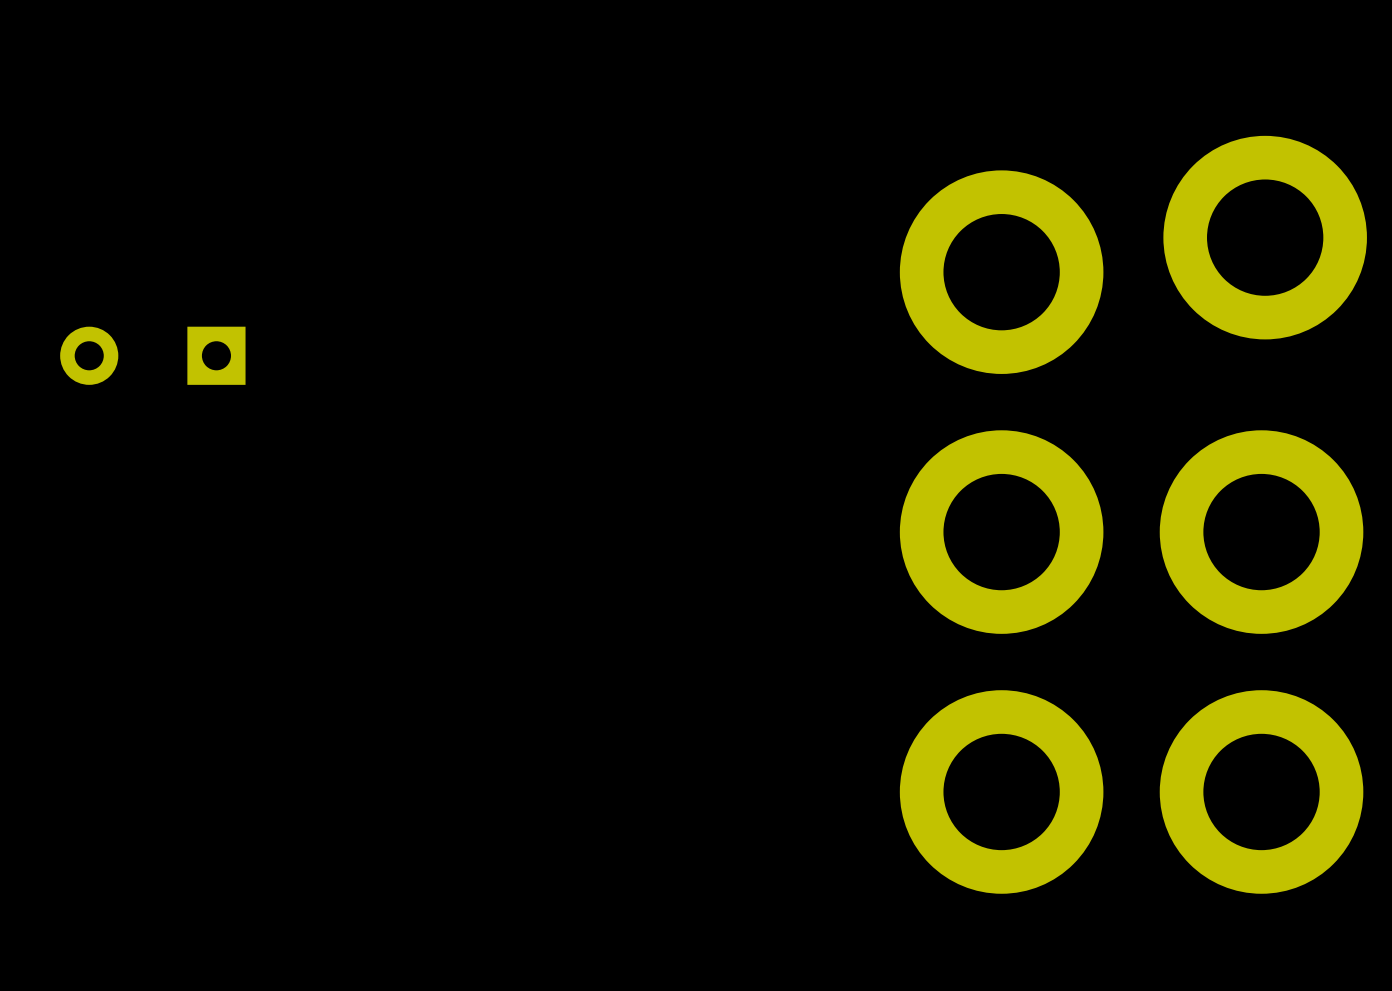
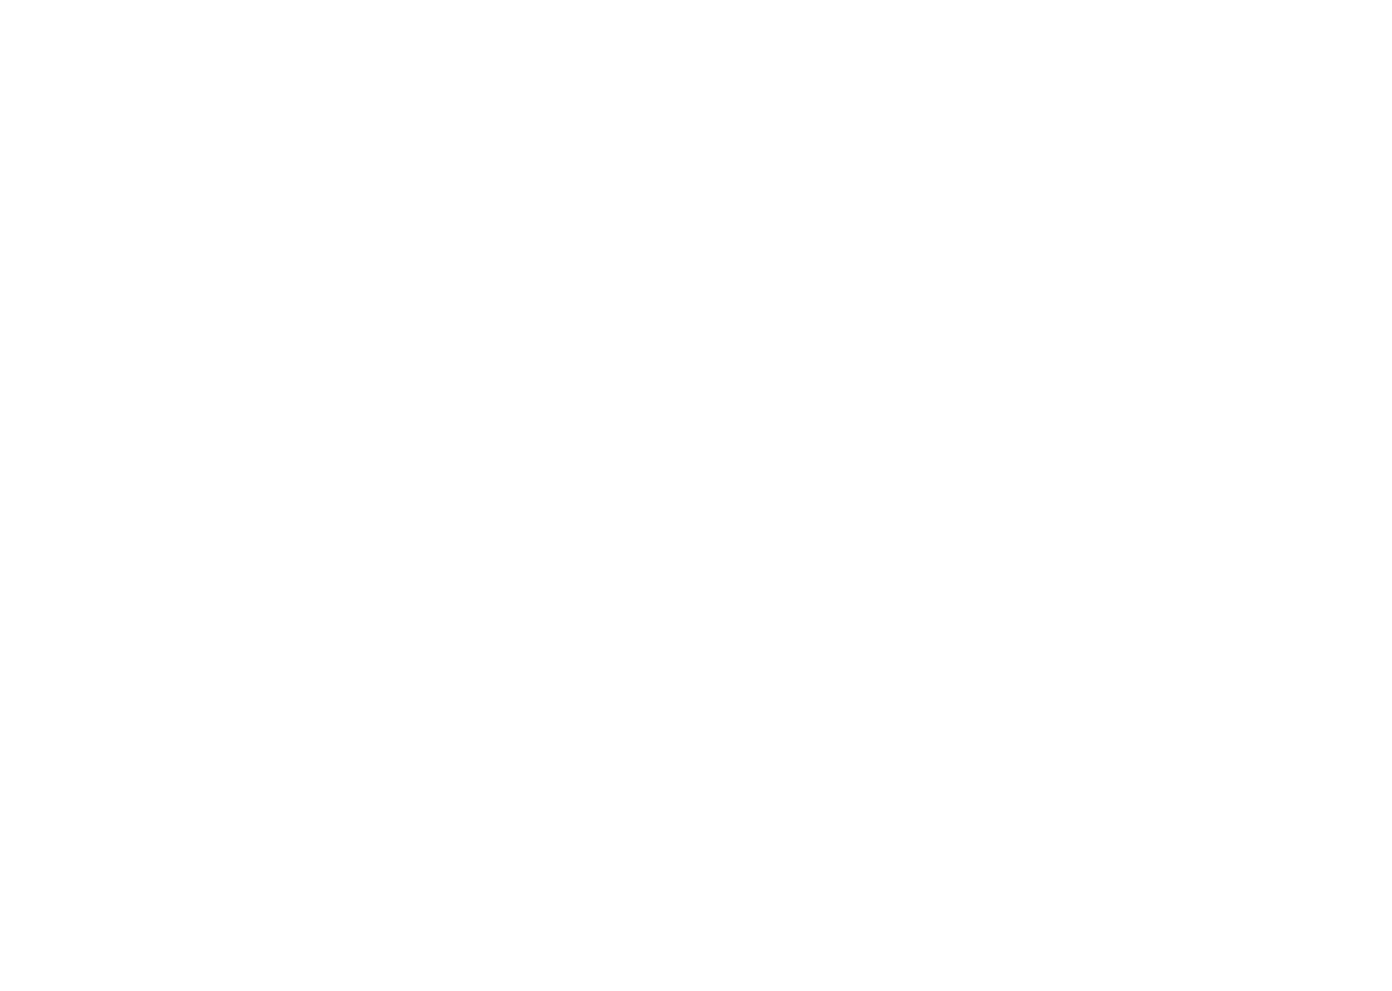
part: (1265, 237) -> none
part: (1001, 272) -> none
part: (152, 355) -> none
part: (1001, 532) -> none
part: (1261, 532) -> none
part: (1001, 791) -> none
part: (1261, 791) -> none

